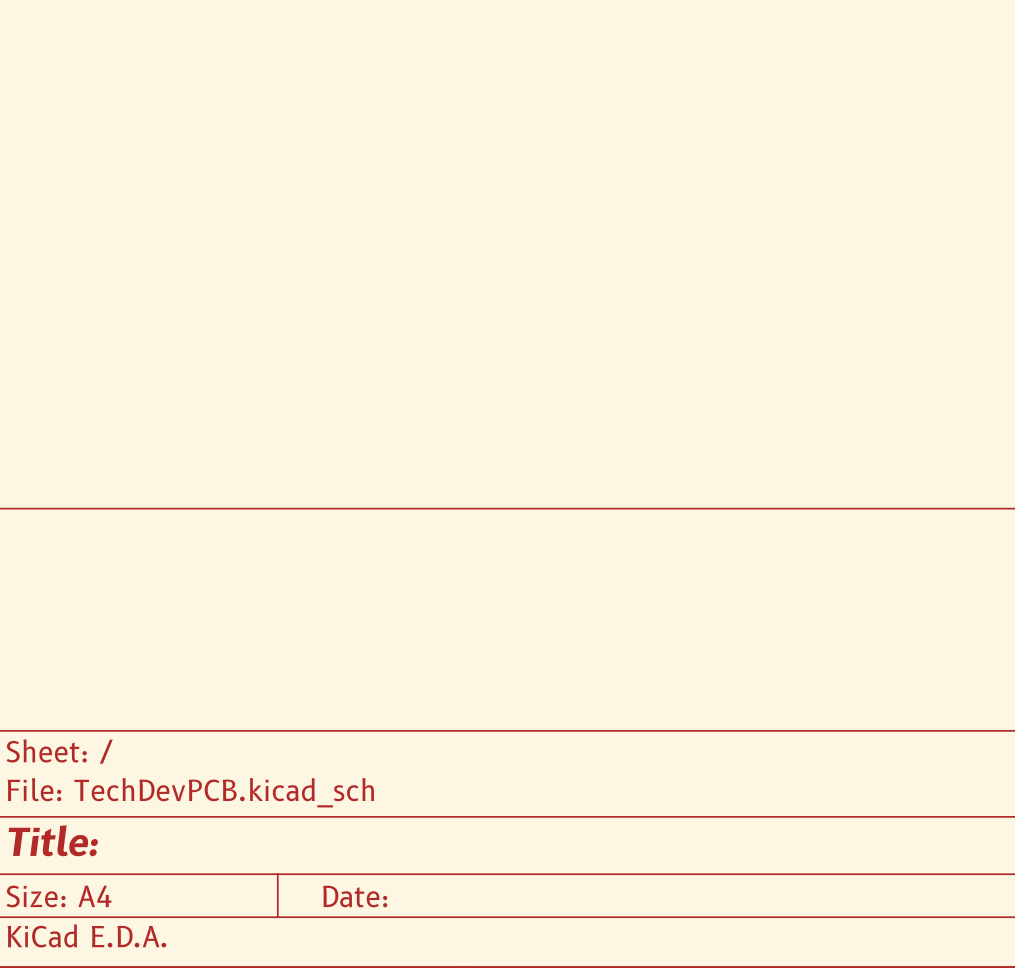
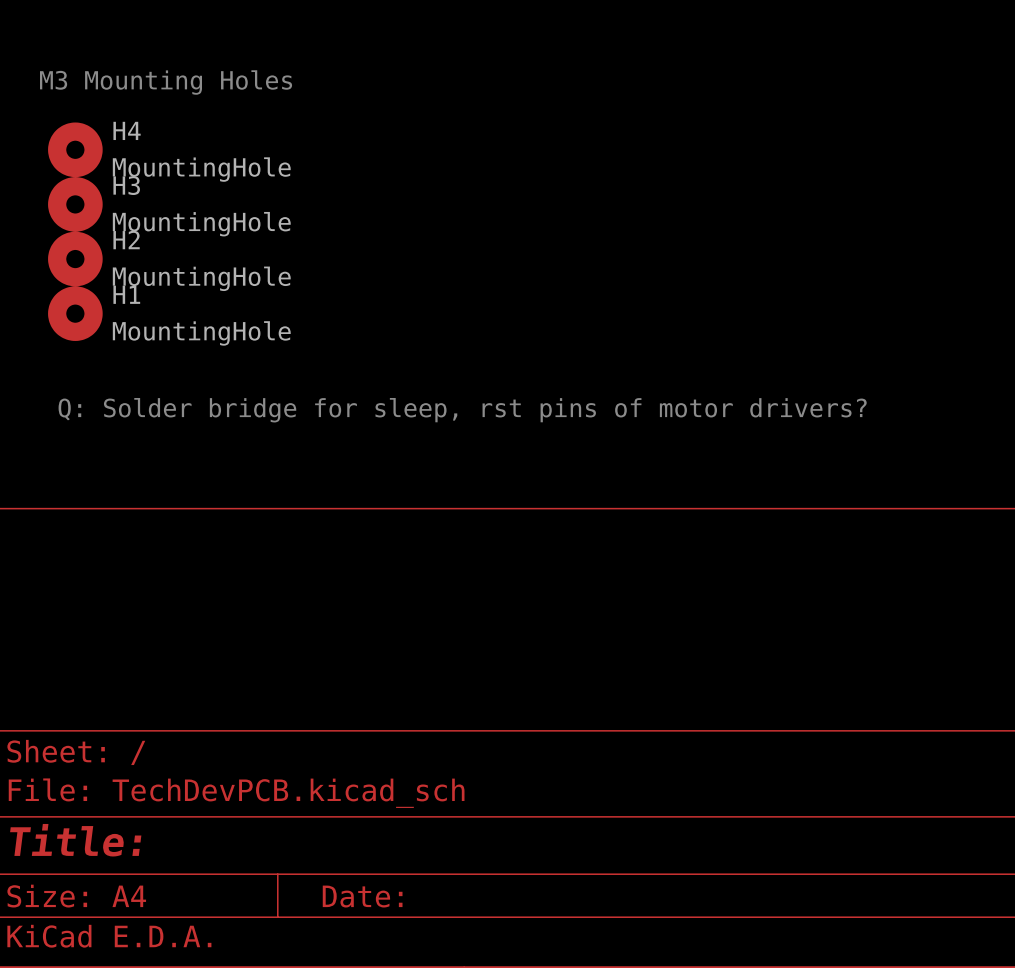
text: none -> M3 Mounting Holes (166, 82)
H4: none -> MountingHole (75, 149)
H3: none -> MountingHole (75, 204)
H2: none -> MountingHole (75, 259)
H1: none -> MountingHole (75, 313)
text: none -> Q: Solder bridge for sleep, rst pins of motor drivers? (462, 410)

